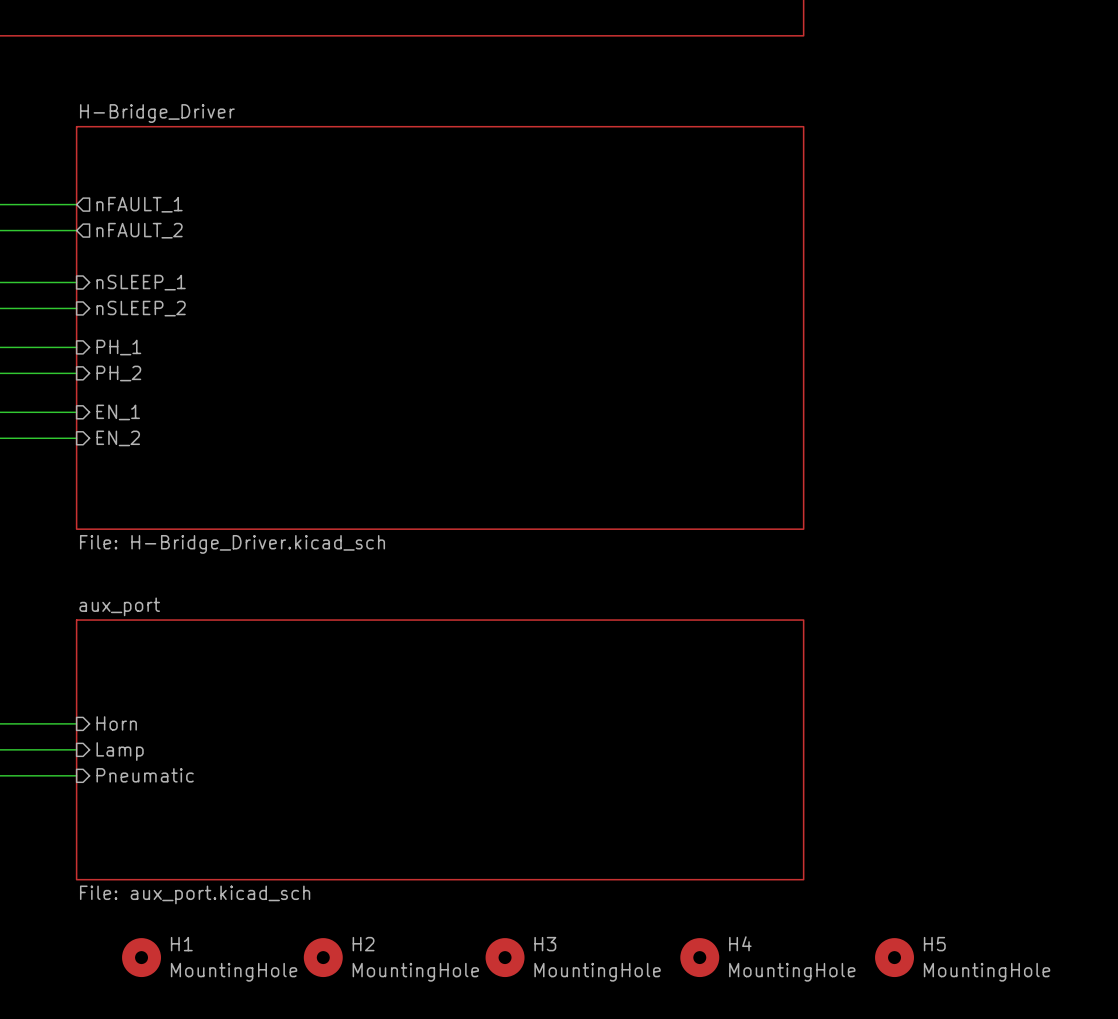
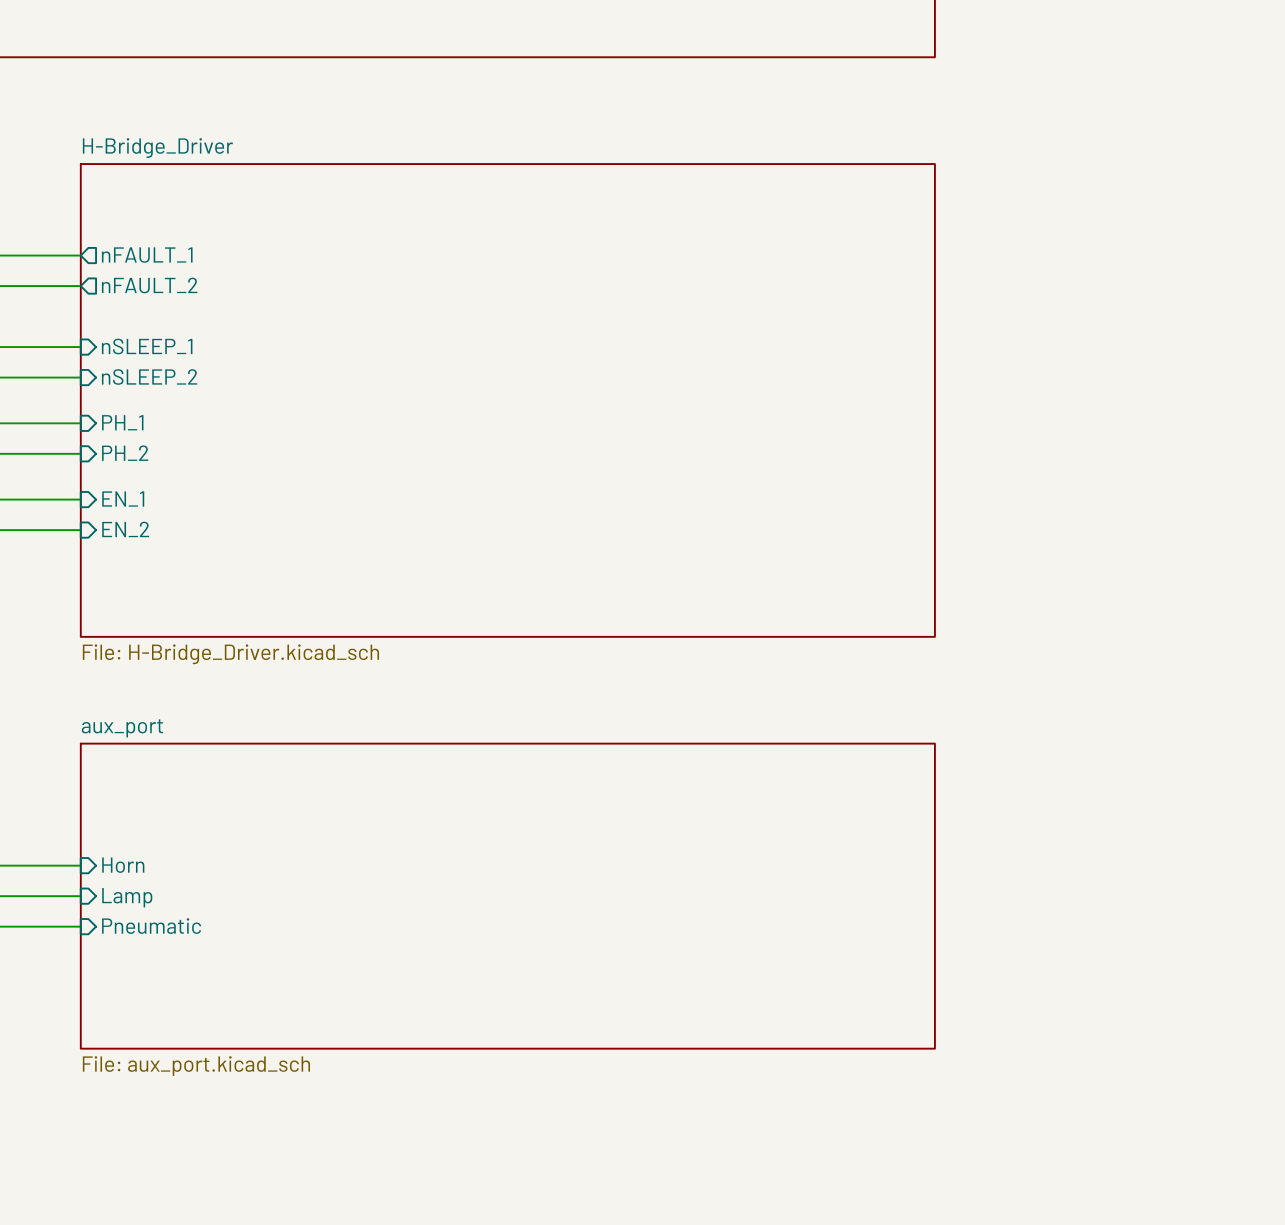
H1: MountingHole (141, 957) -> none
H2: MountingHole (323, 957) -> none
H3: MountingHole (505, 957) -> none
H4: MountingHole (699, 957) -> none
H5: MountingHole (894, 957) -> none

